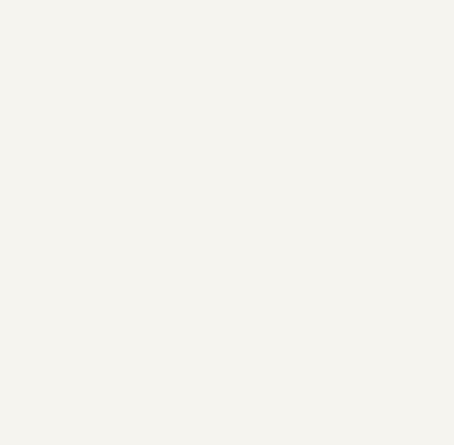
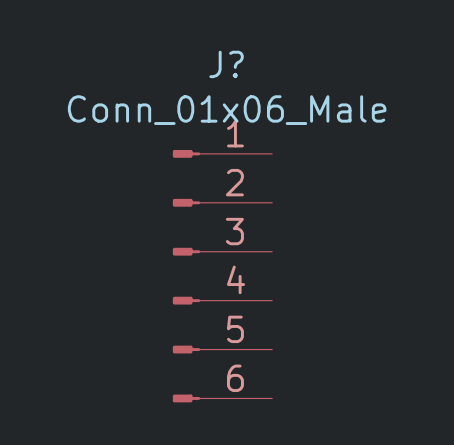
J?: none -> Conn_01x06_Male (222, 276)

